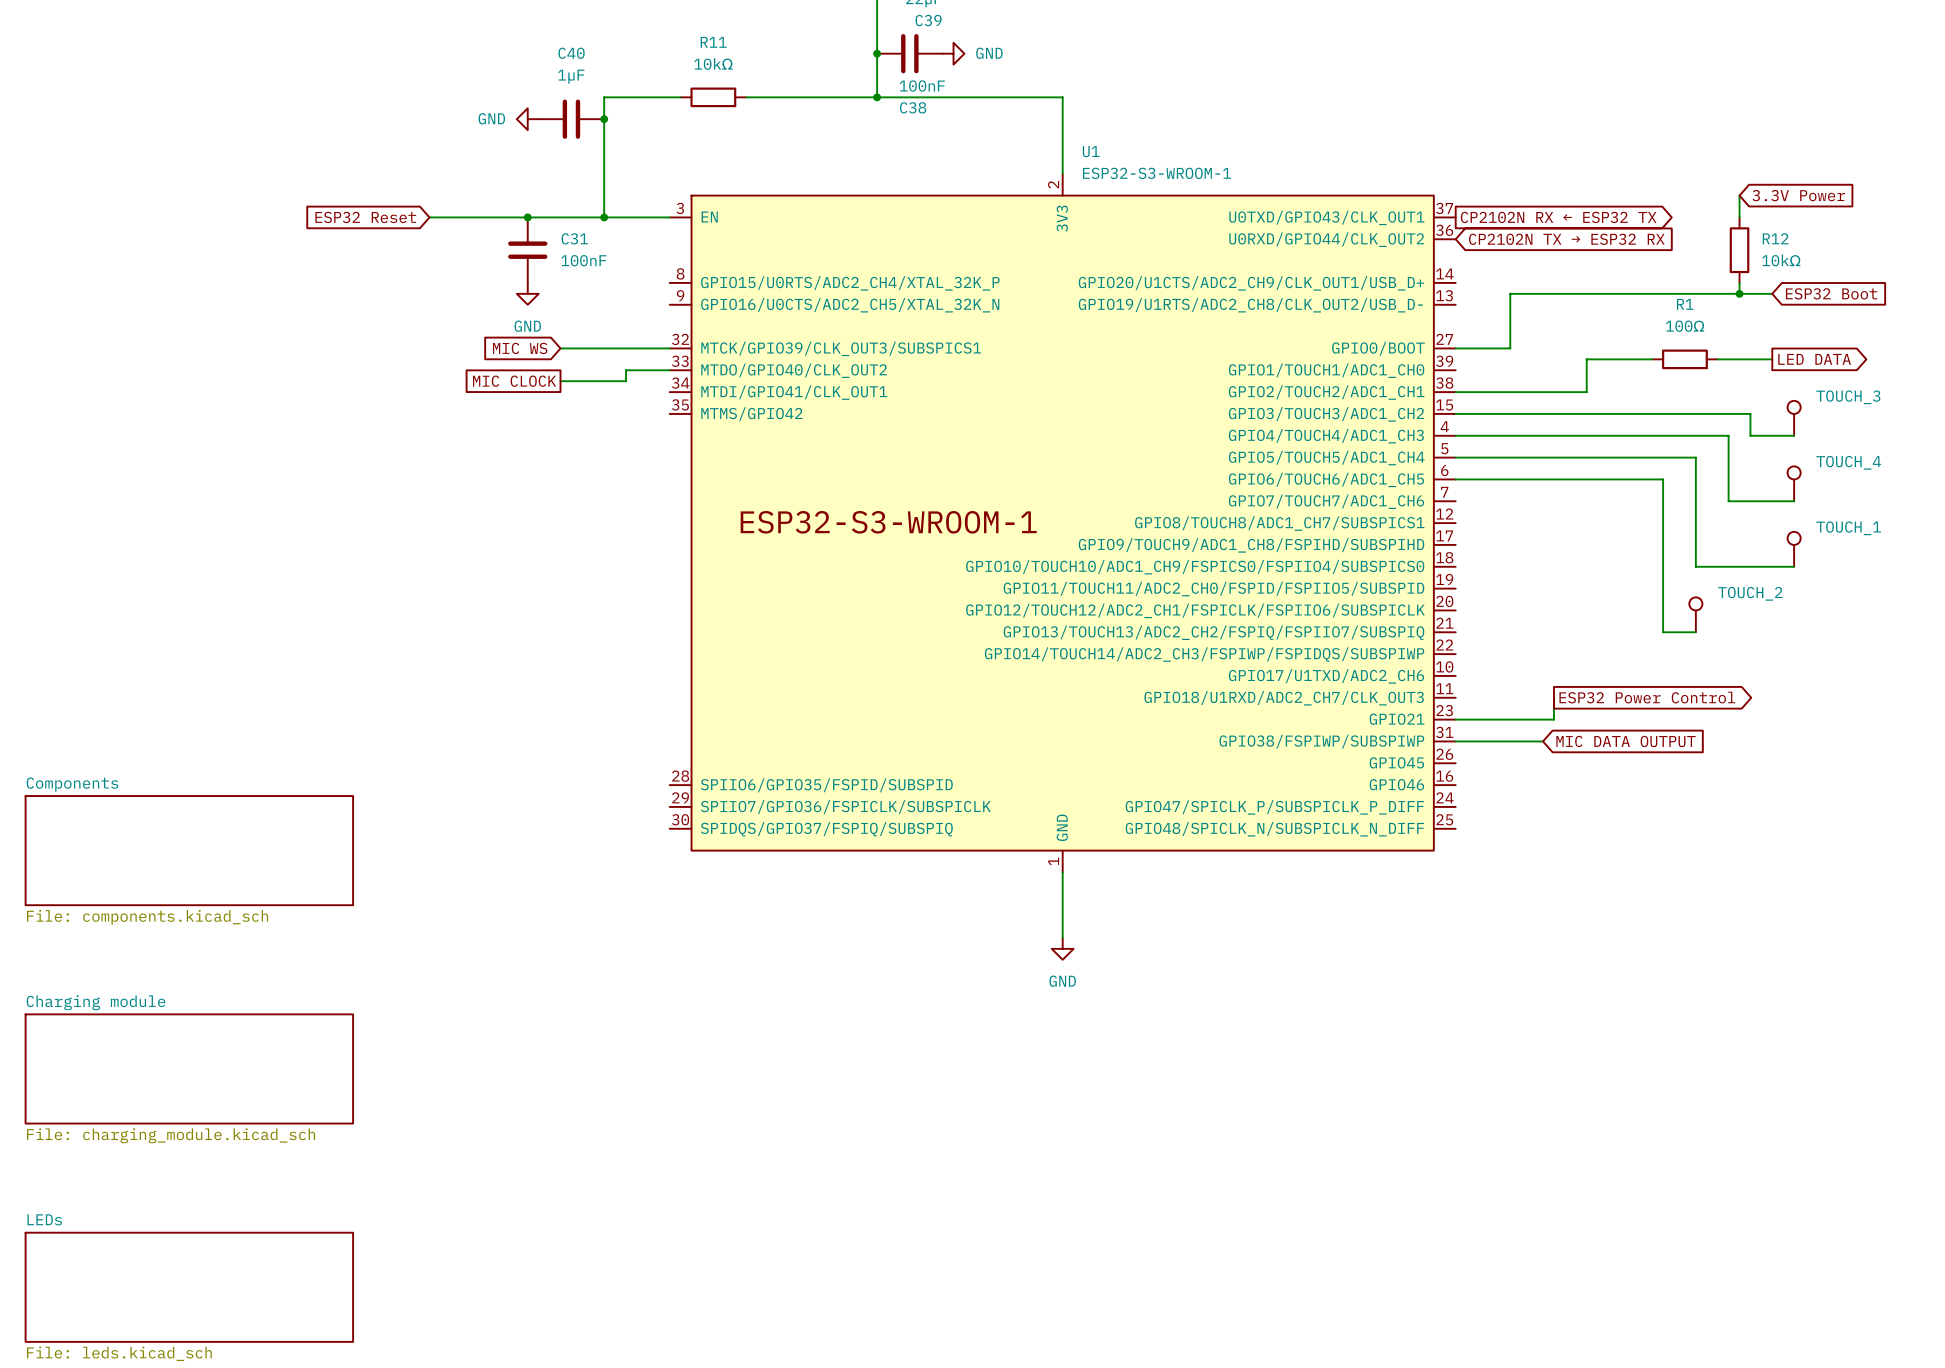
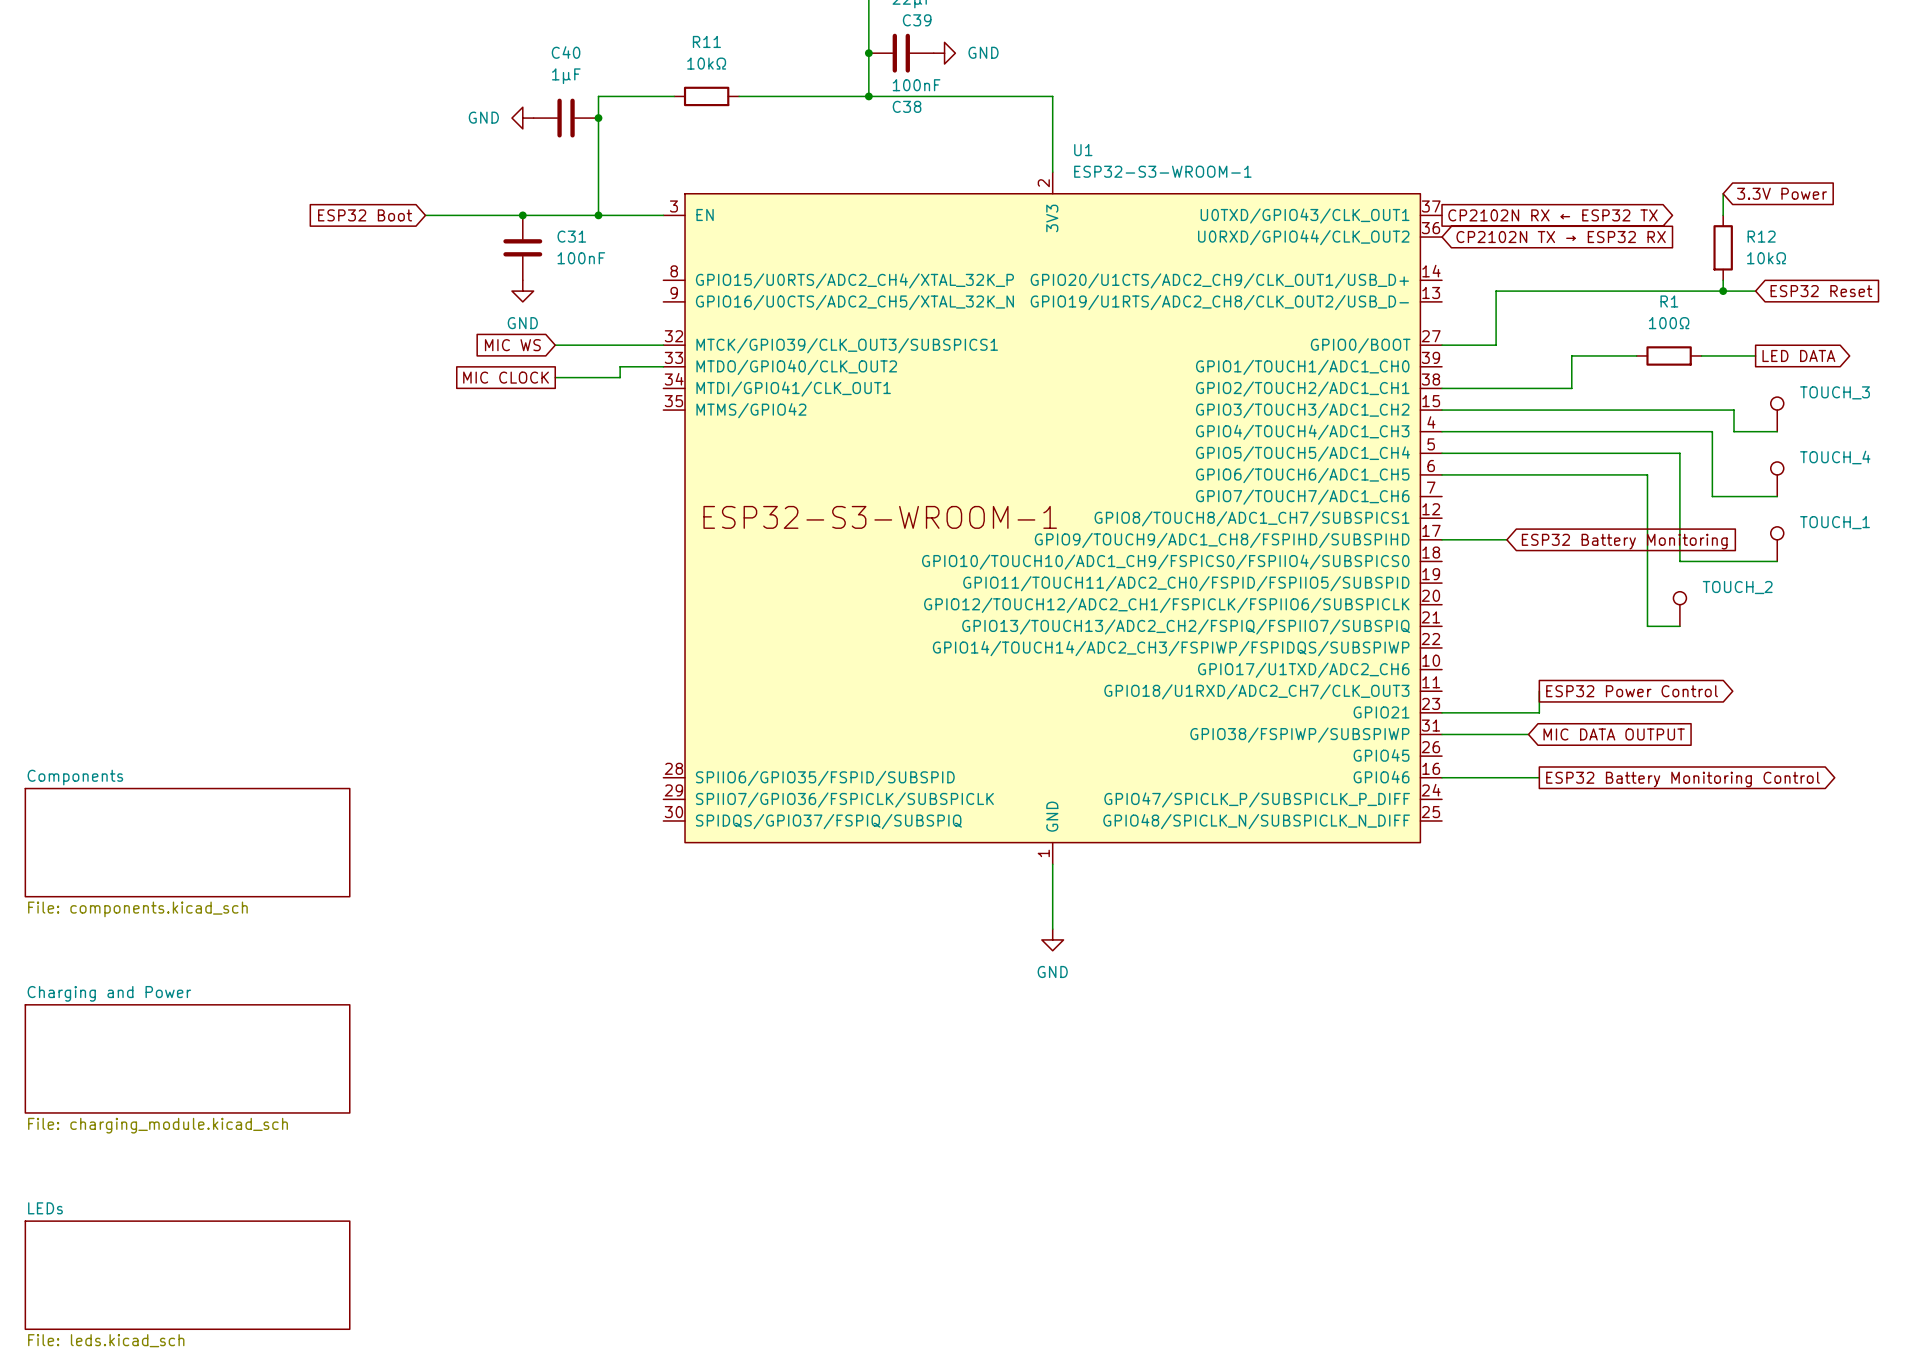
global label: ESP32 Reset (365, 217) -> ESP32 Boot (365, 215)
global label: ESP32 Boot (1831, 293) -> ESP32 Reset (1821, 291)
wire: none -> (1442, 539) (1506, 539)
global label: none -> ESP32 Battery Monitoring (1624, 541)
wire: none -> (1442, 777) (1539, 777)
global label: none -> ESP32 Battery Monitoring Control (1683, 779)
sheet Charging module name: Charging module (95, 1002) -> Charging and Power (109, 993)

